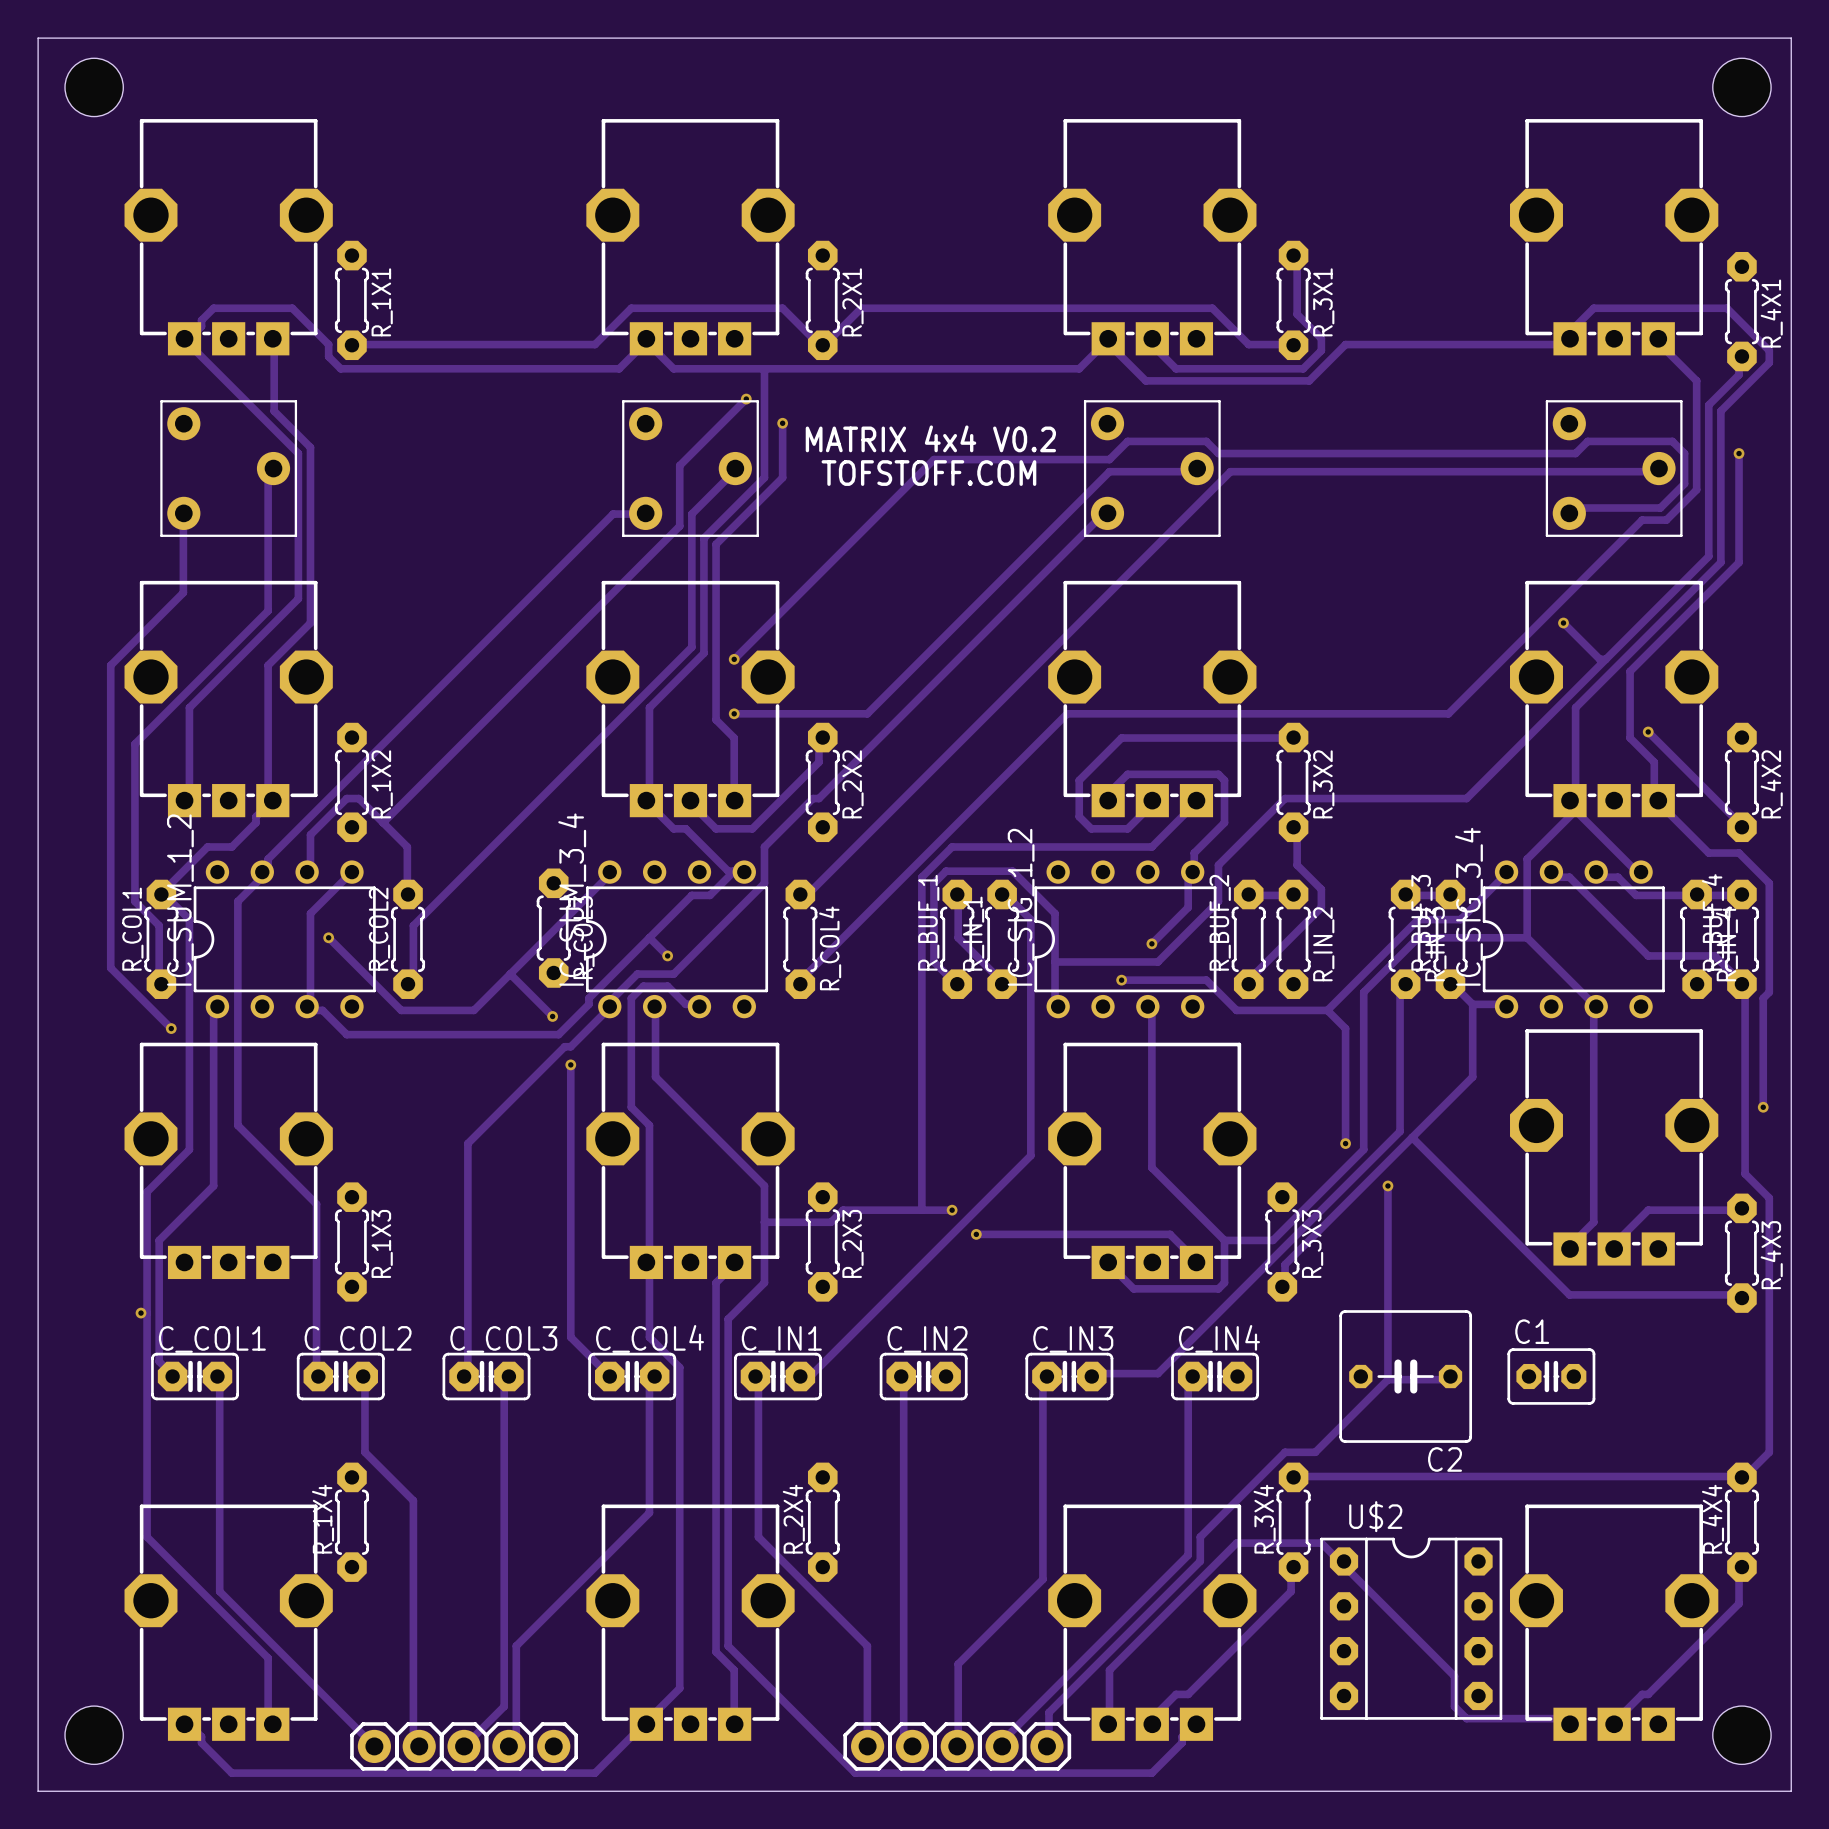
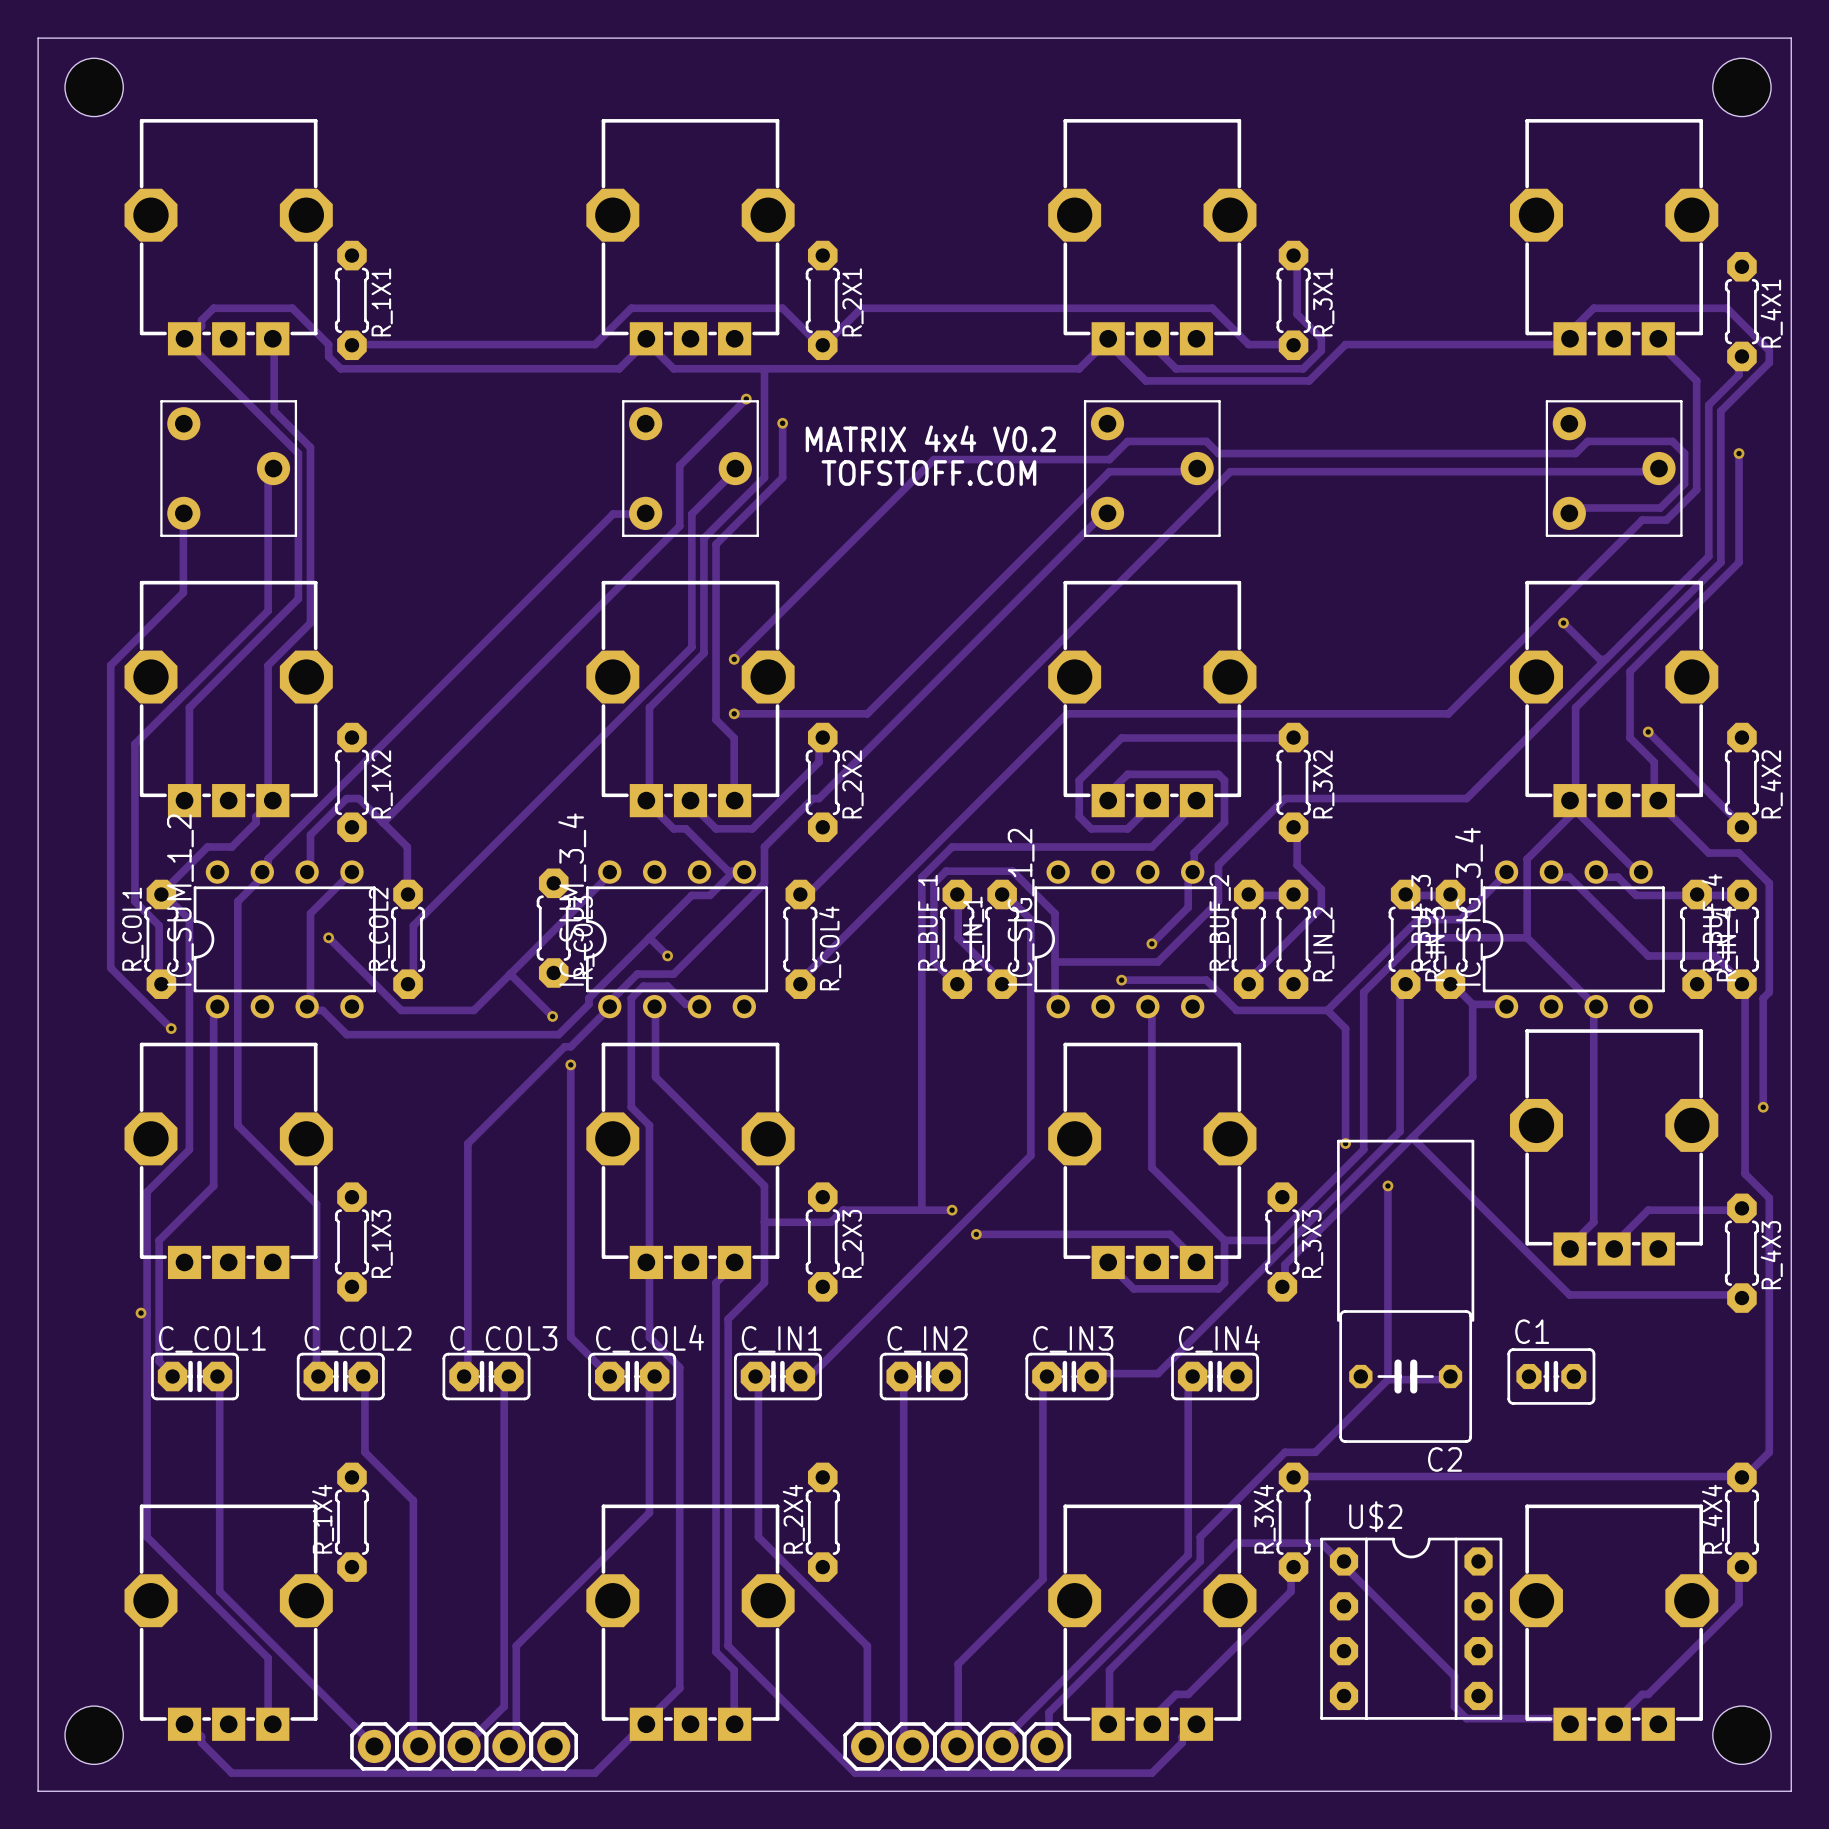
line: none -> (1338, 1320) (1338, 1141) (1472, 1141) (1472, 1320)

